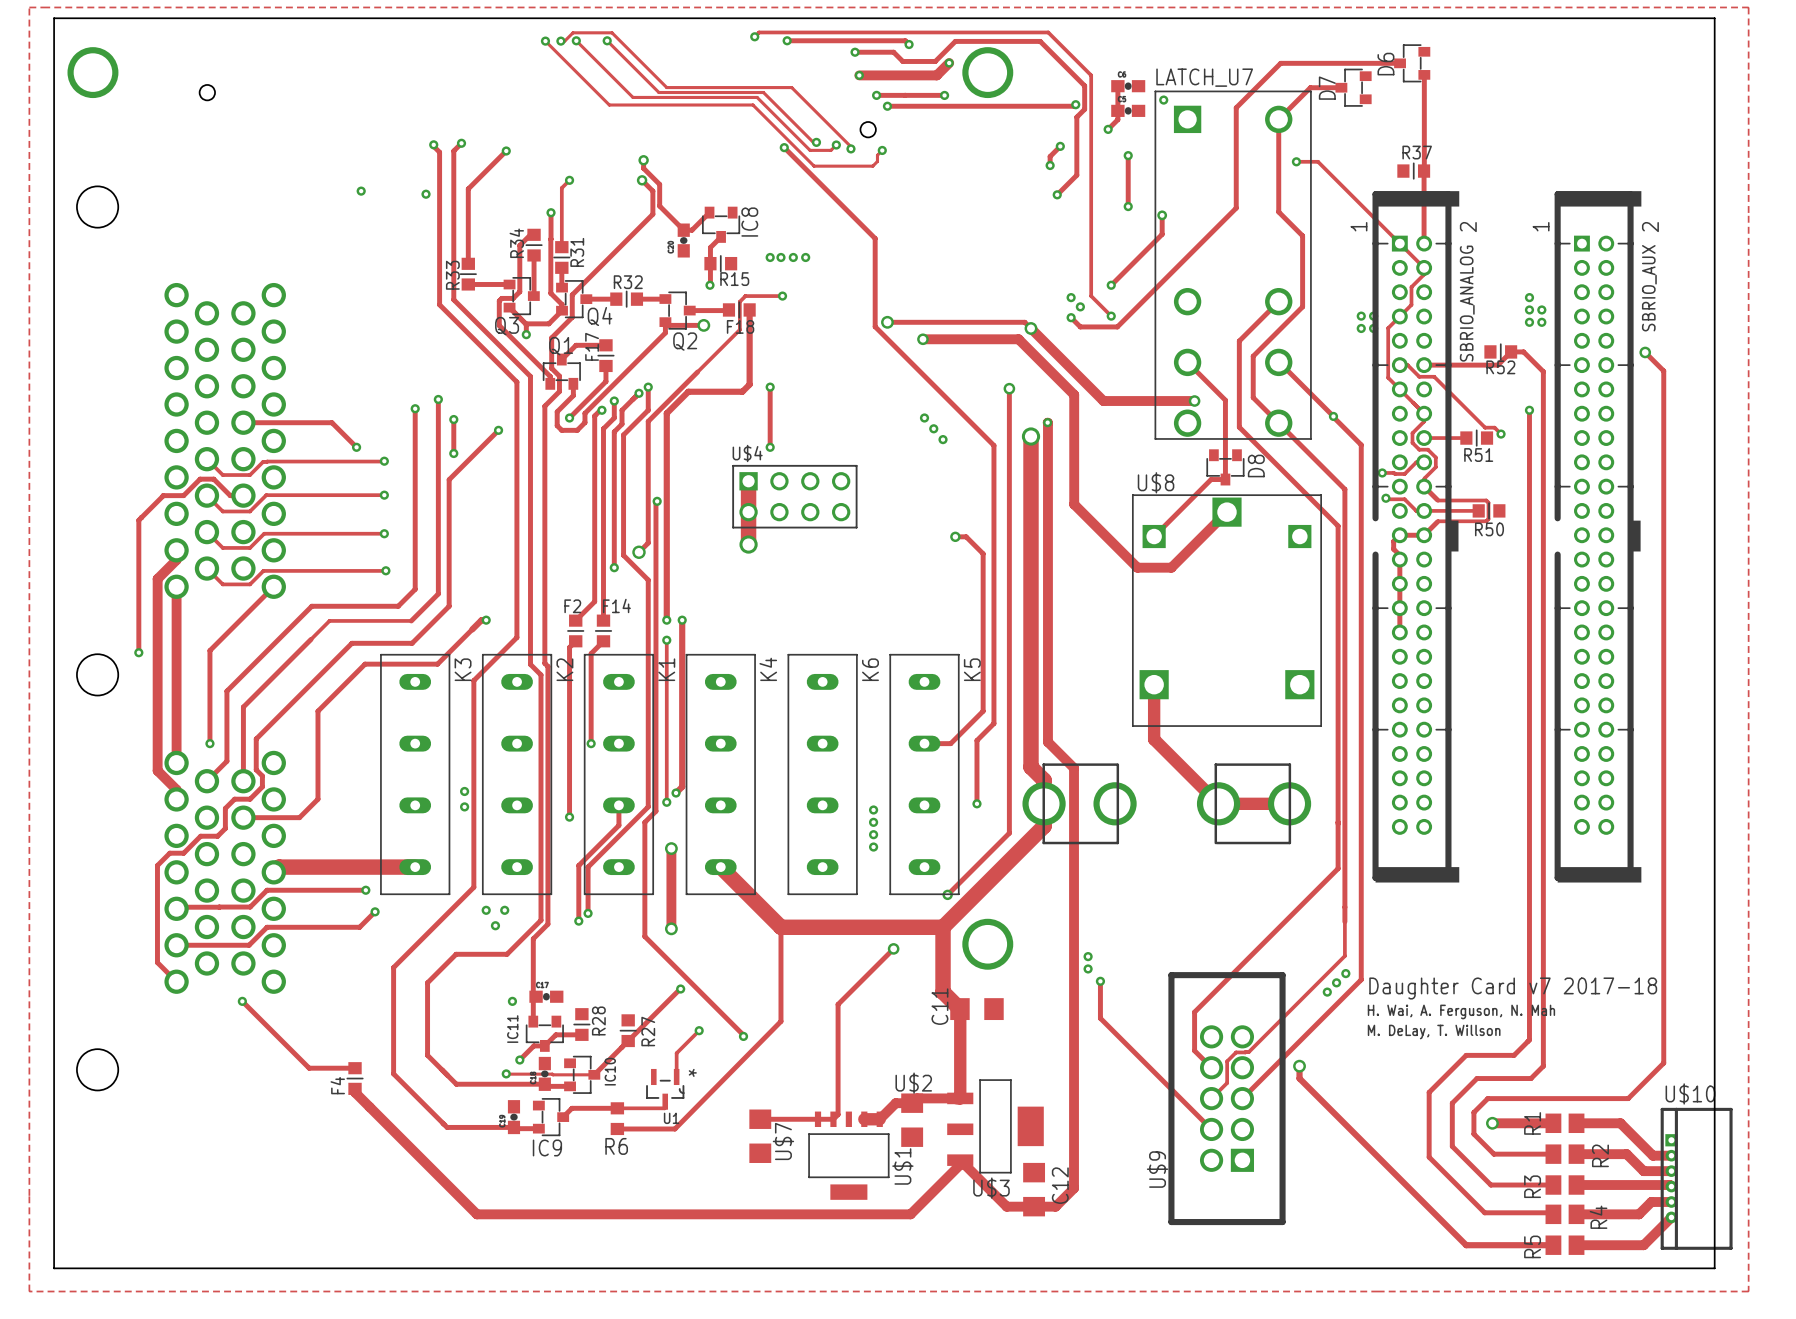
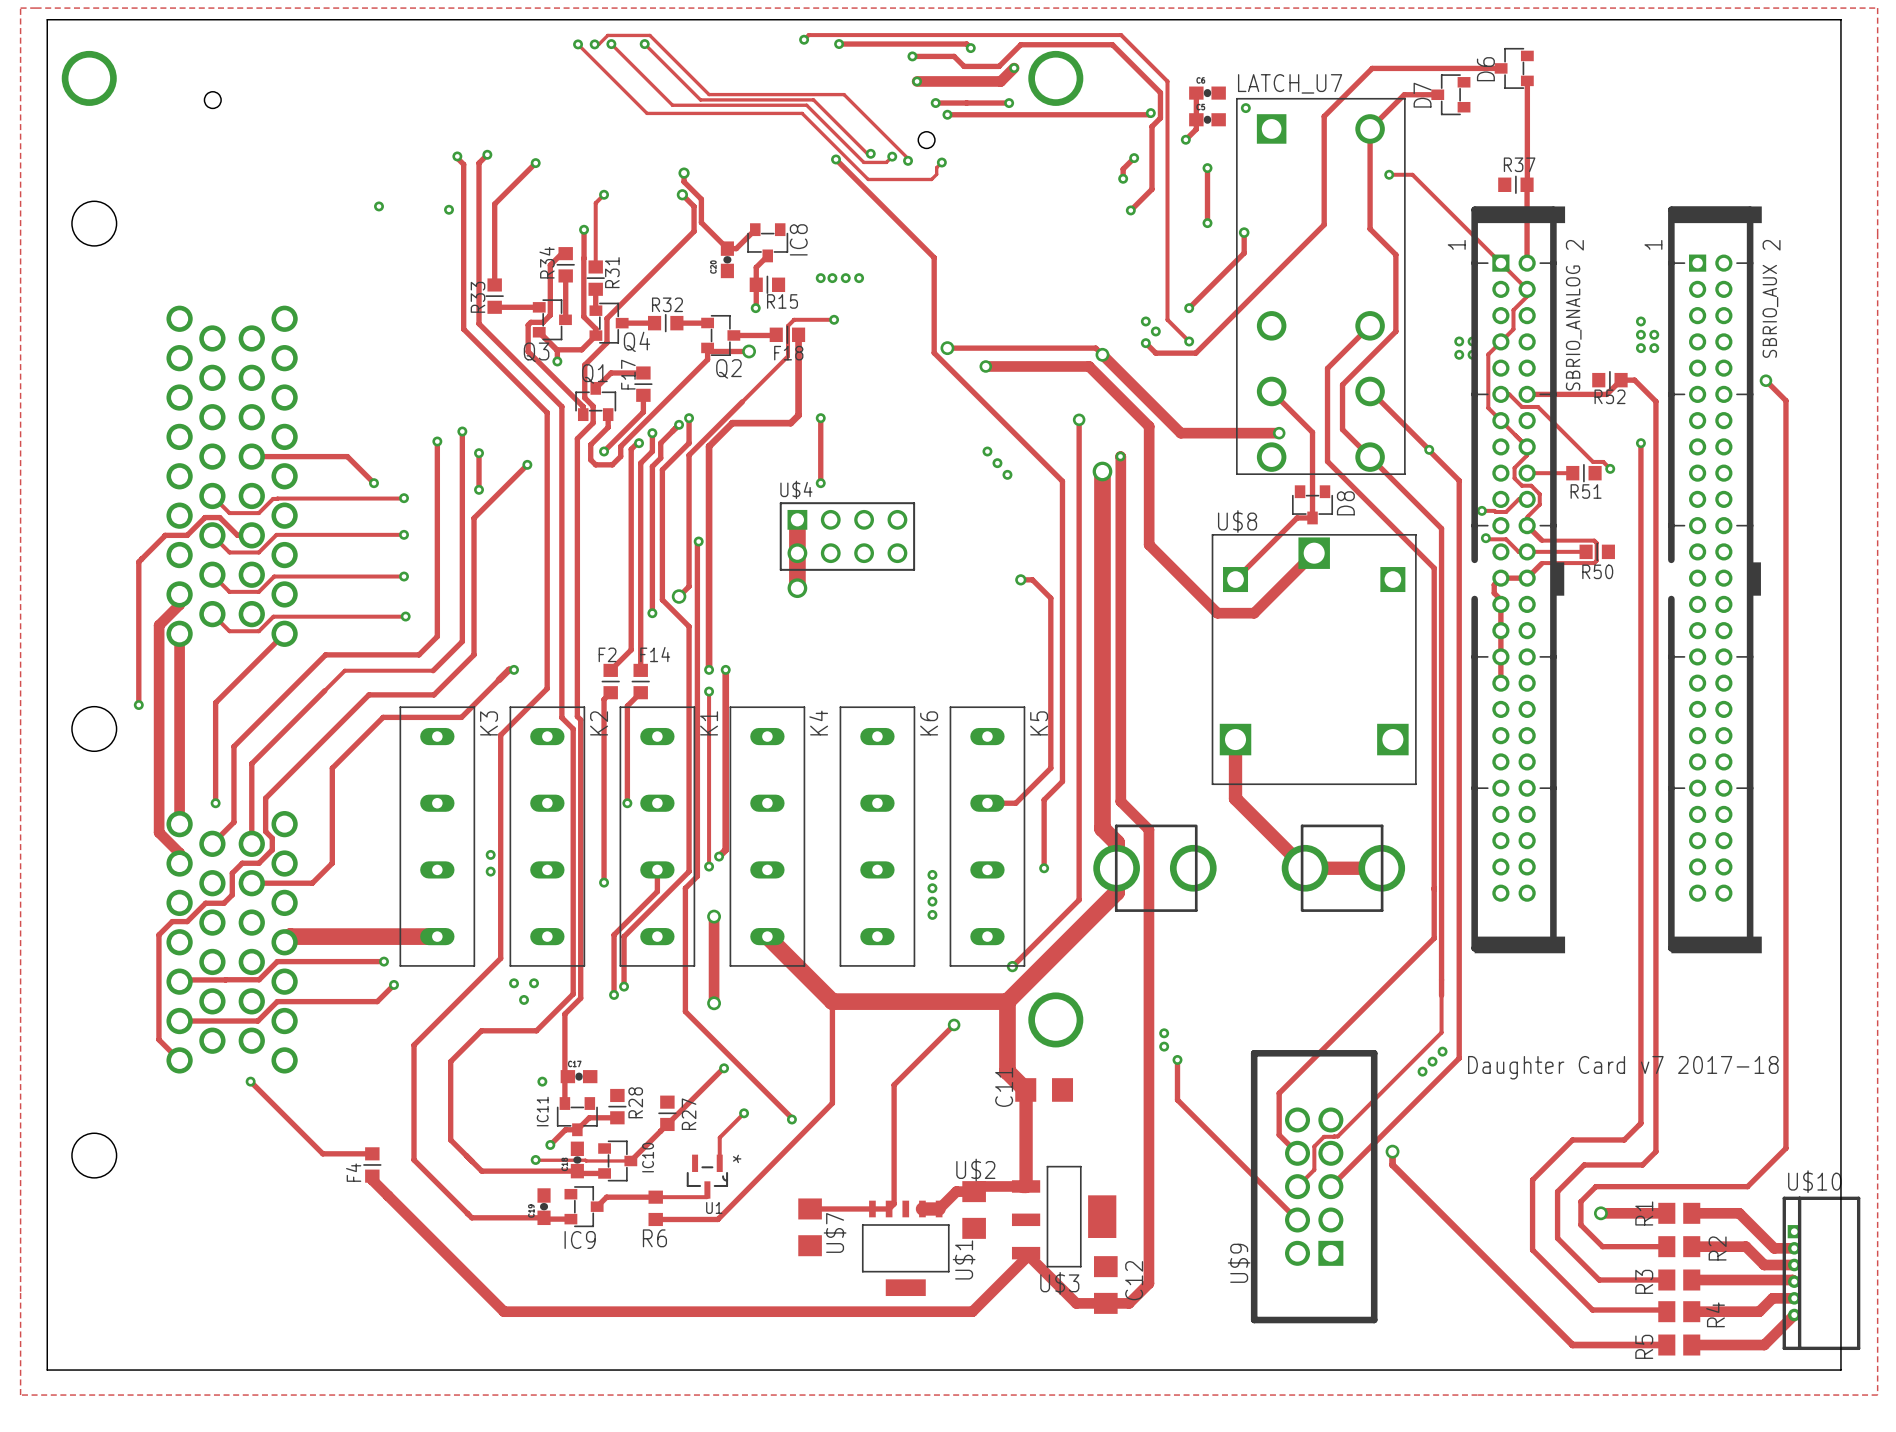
text: H. Wai, A. Ferguson, N. Mah (1461, 1011) -> none
text: M. DeLay, T. Willson (1434, 1032) -> none

